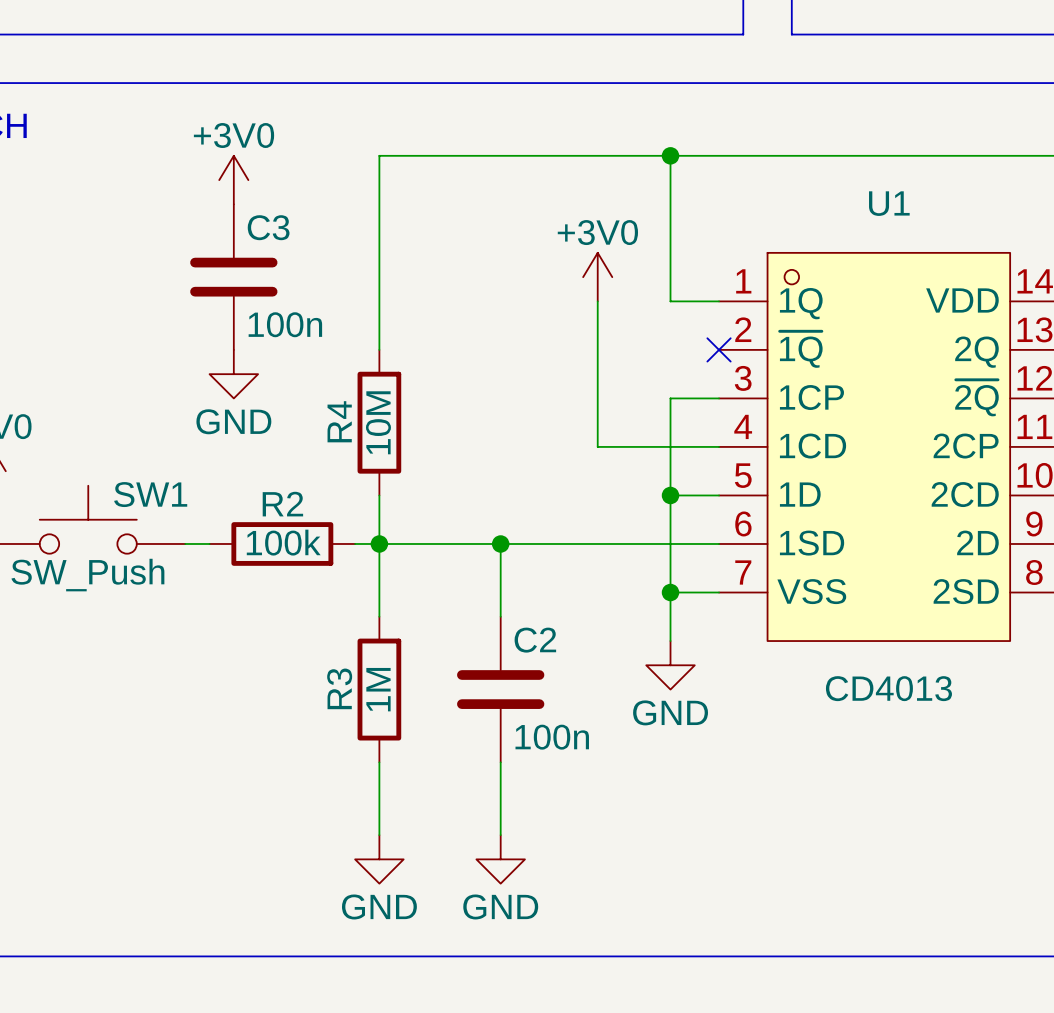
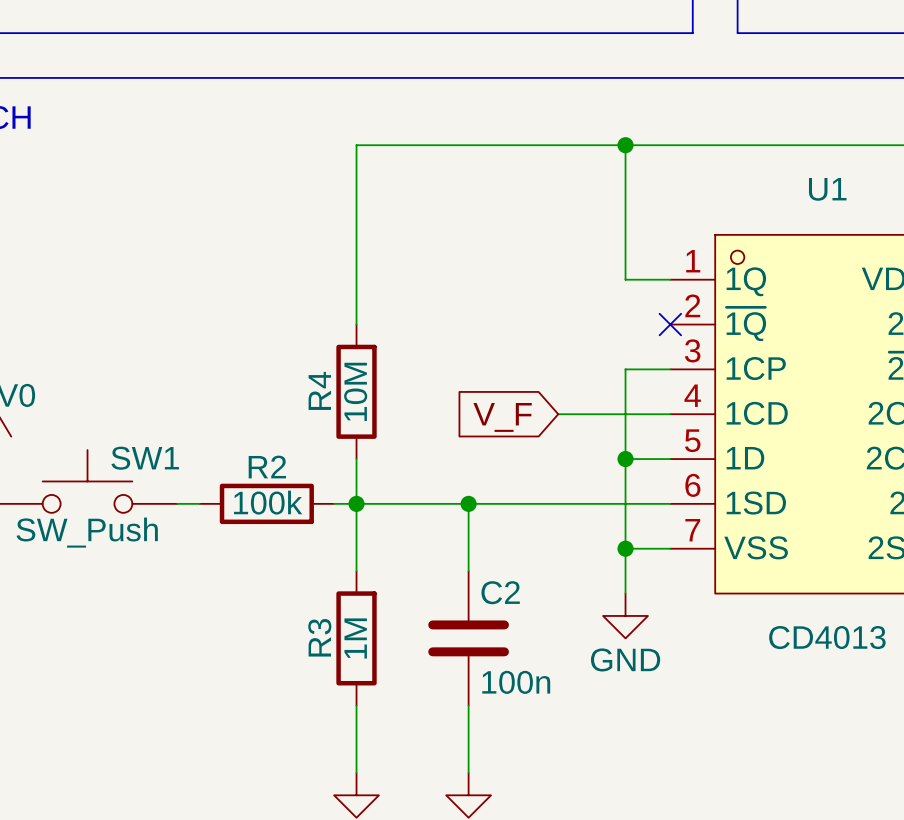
power symbol: +3V0 (233, 180) -> none
C3: 100n (233, 277) -> none
power symbol: +3V0 (597, 277) -> none
wire: (597, 301) (597, 446) -> none
power symbol: GND (233, 374) -> none
global label: none -> V_F (502, 417)

